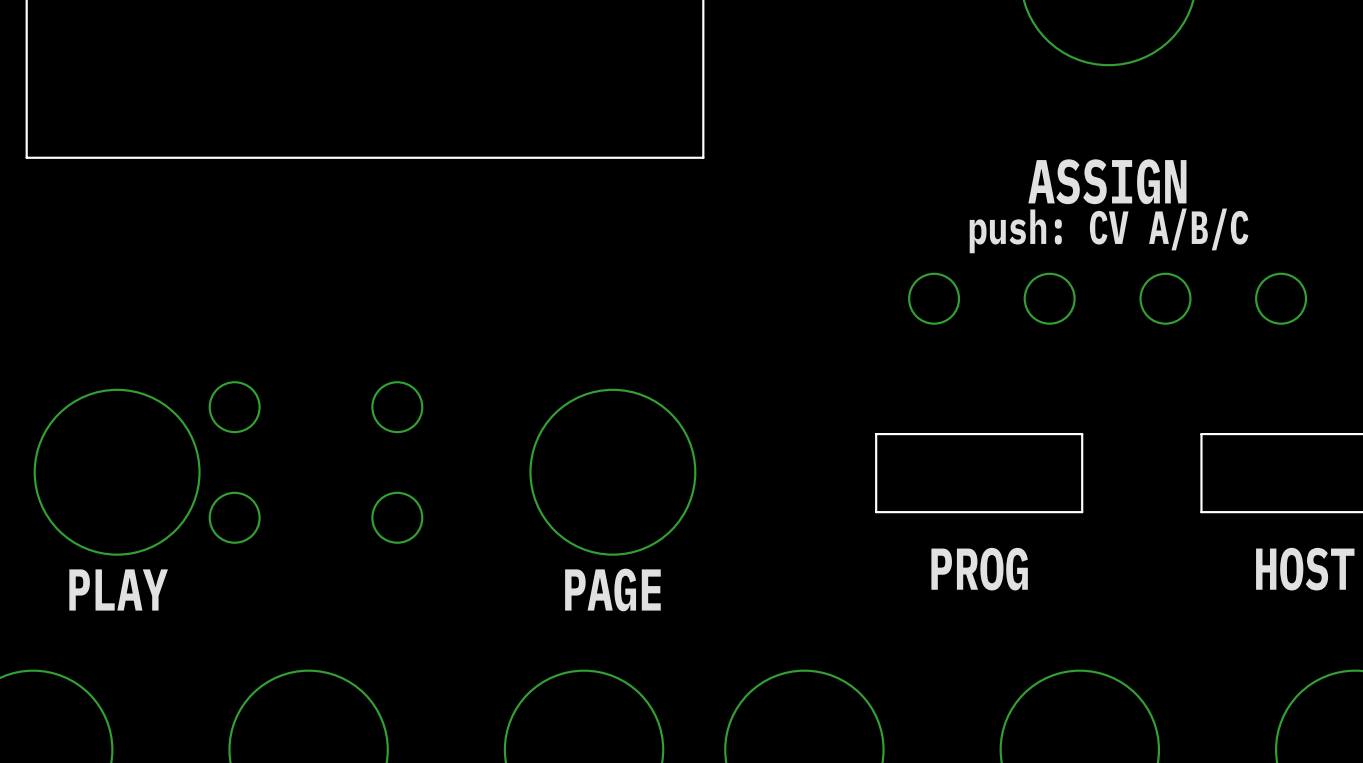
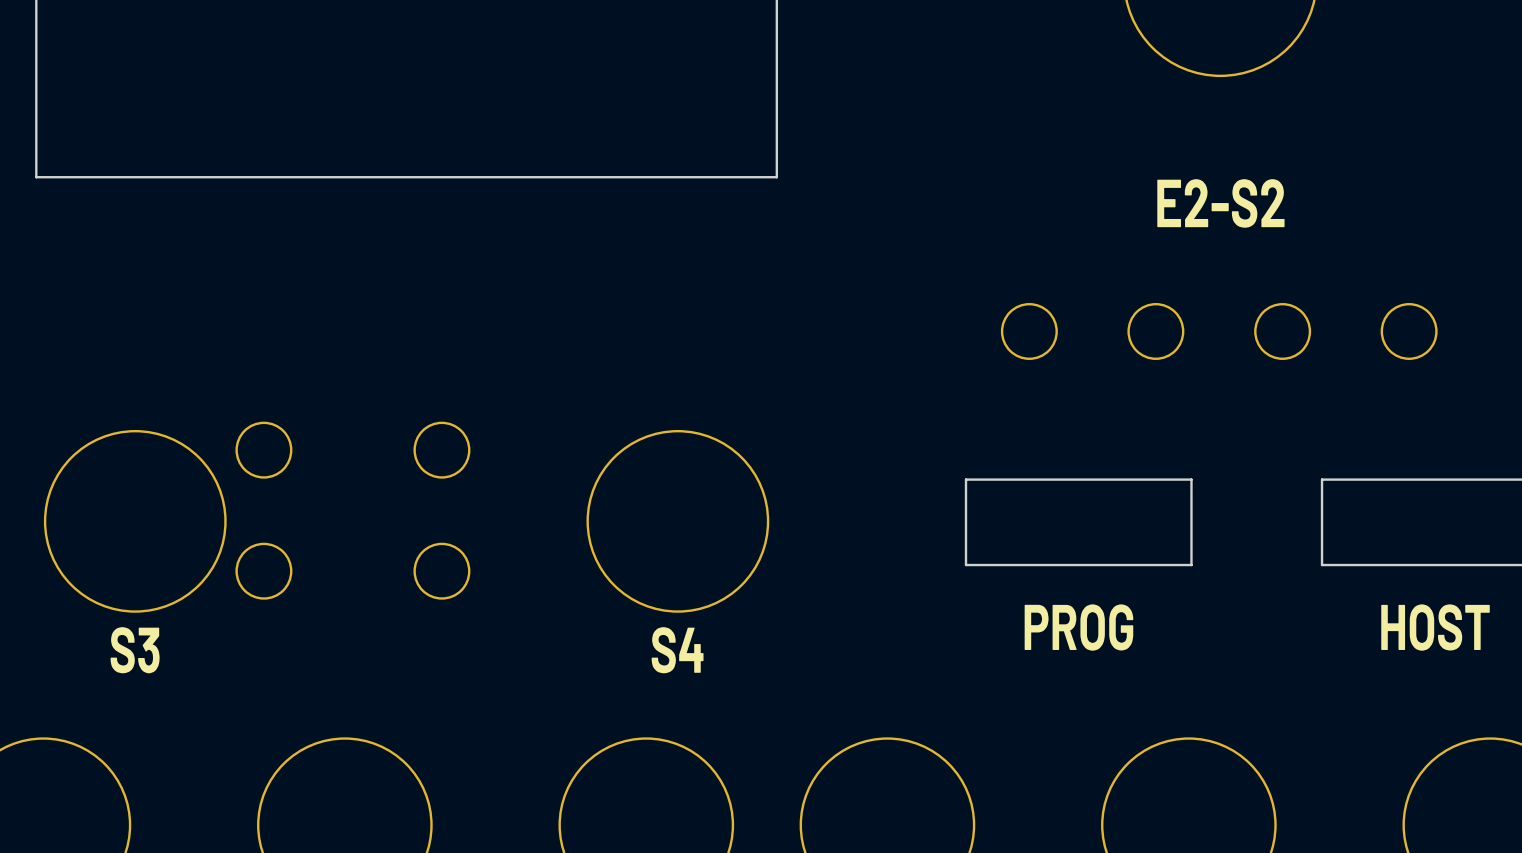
text: ASSIGN (1107, 181) -> E2-S2 (1220, 203)
text: push: CV A/B/C (1109, 230) -> none
text: PLAY (118, 589) -> S3 (135, 650)
text: PAGE (612, 589) -> S4 (677, 650)

